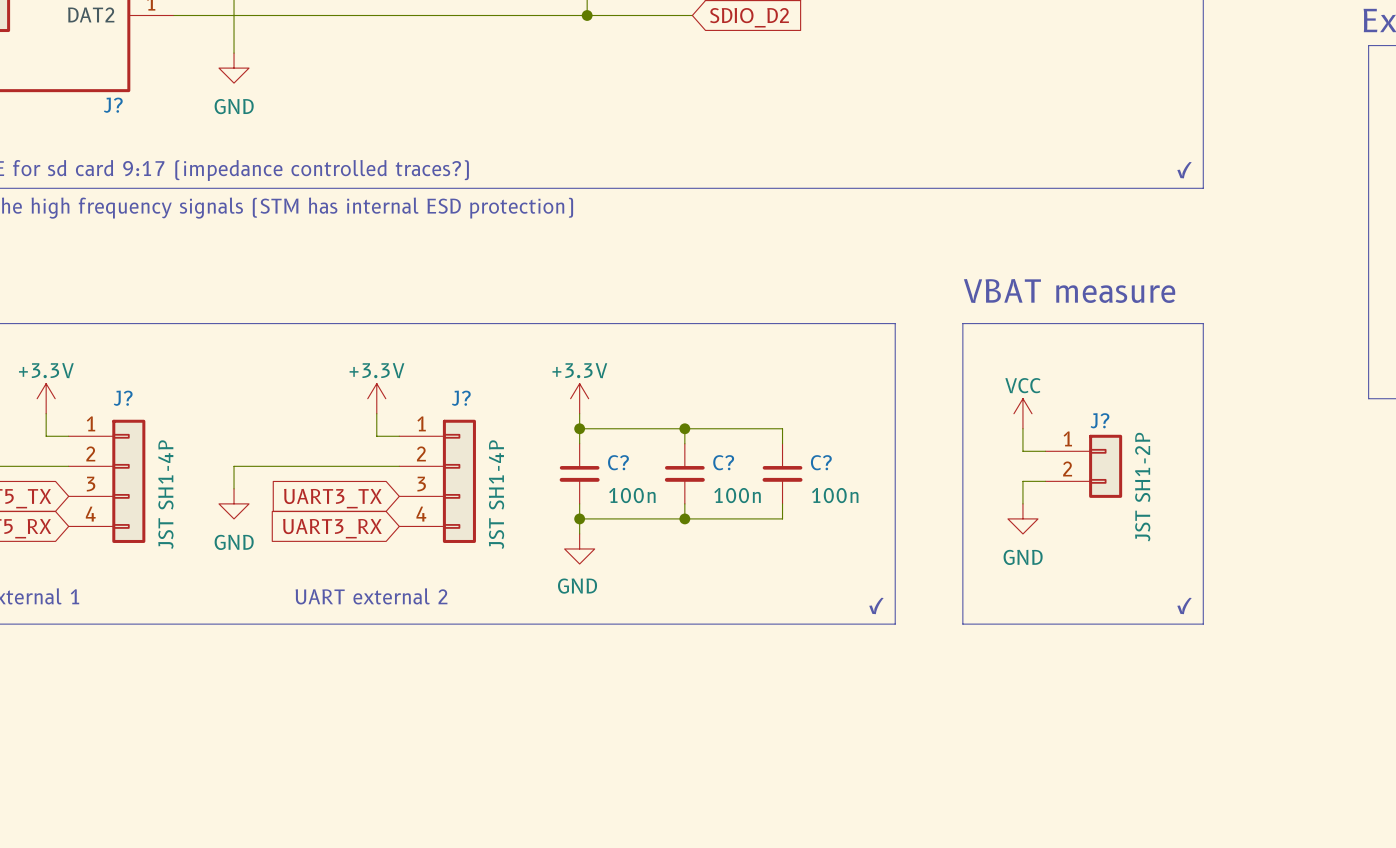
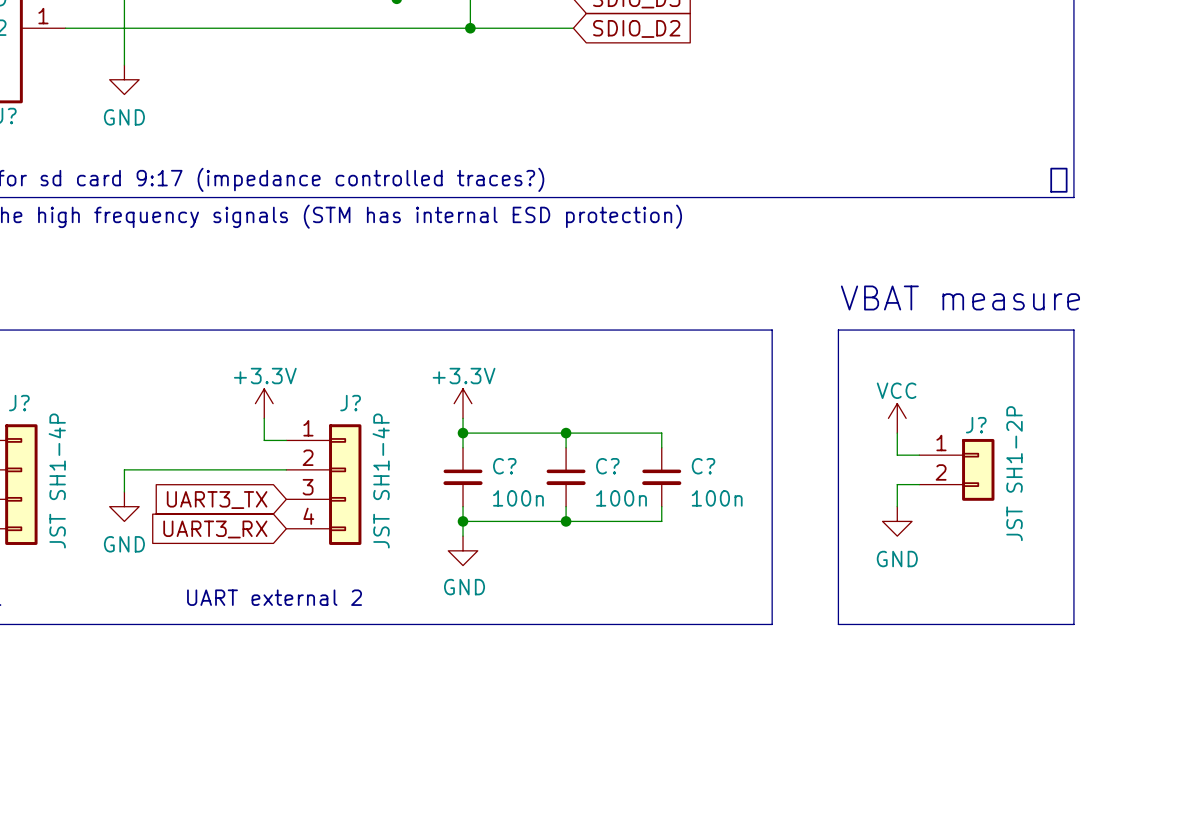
text: ✓ (876, 605) -> none
text: ✓ (1184, 605) -> none

